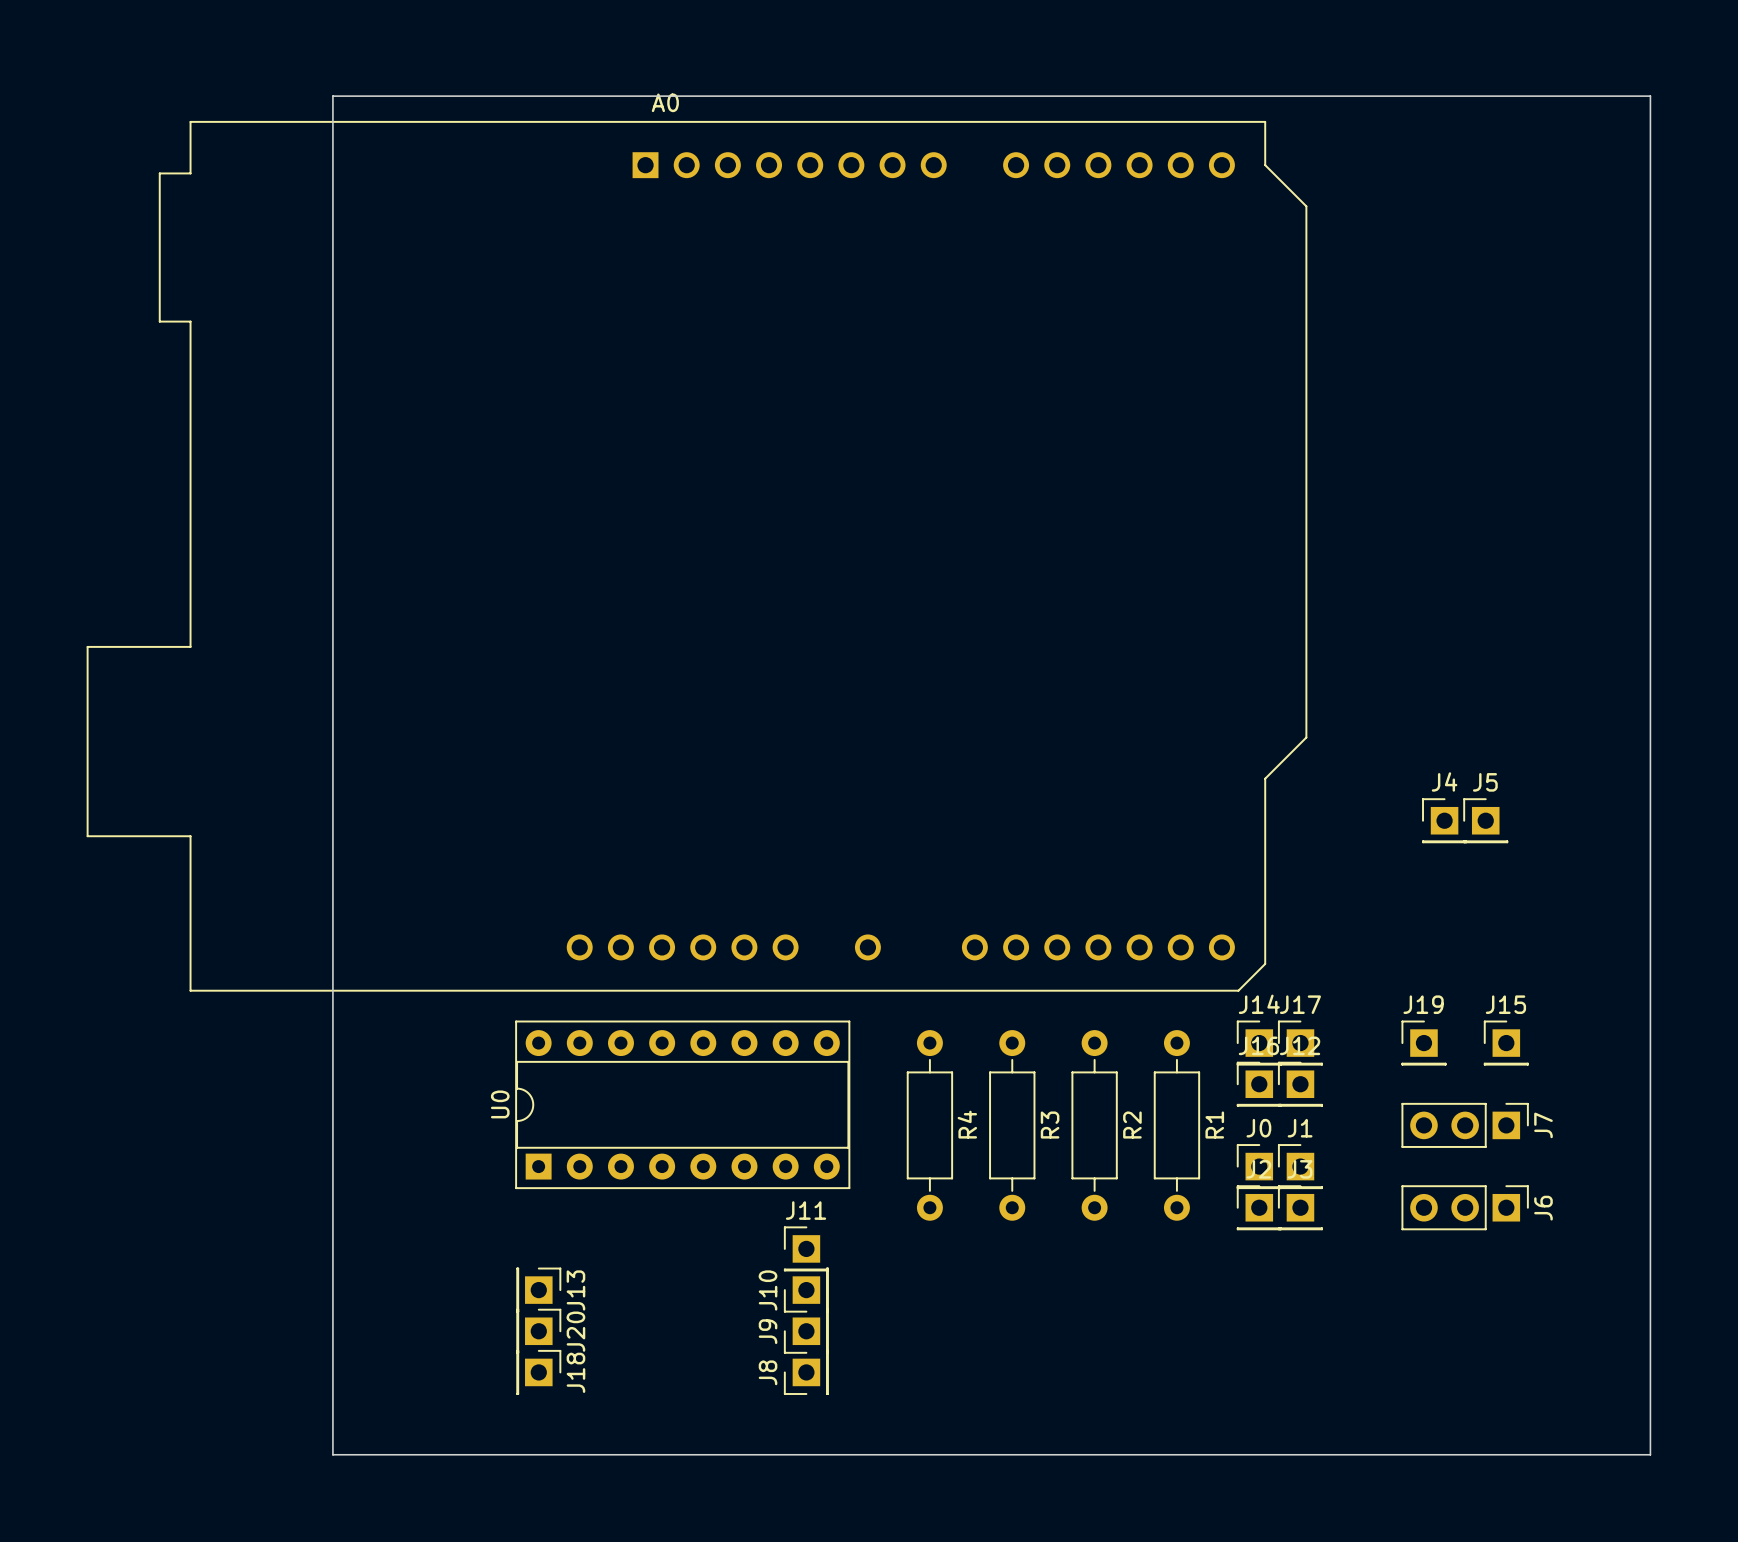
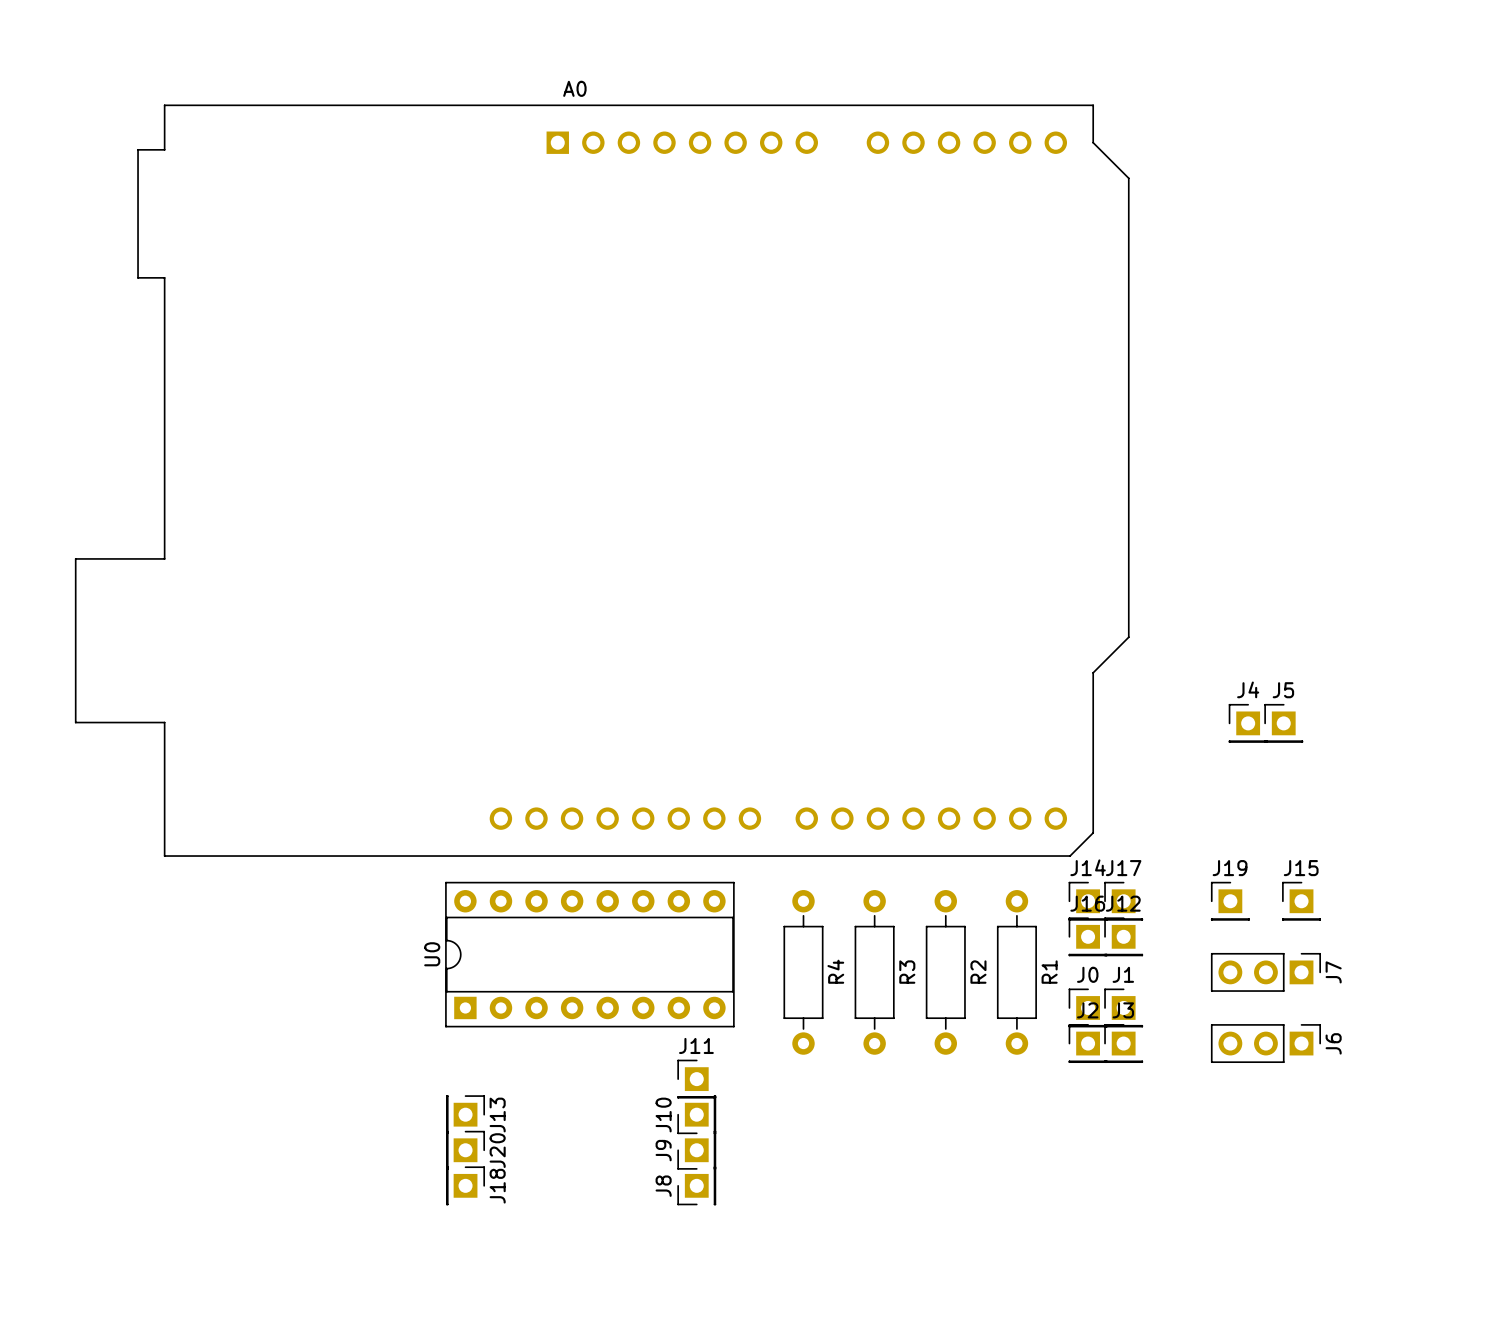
board edge: (332, 96) (1650, 96) (1650, 1454) (332, 1454) (332, 96) -> none
A0 footprint: [86, 120, 1308, 992] -> [74, 104, 1130, 857]
J4 position: (1444, 820) -> (1248, 723)
J5 position: (1485, 820) -> (1283, 723)

